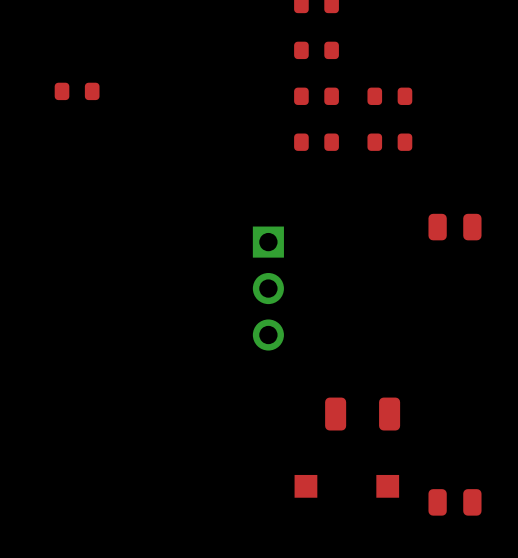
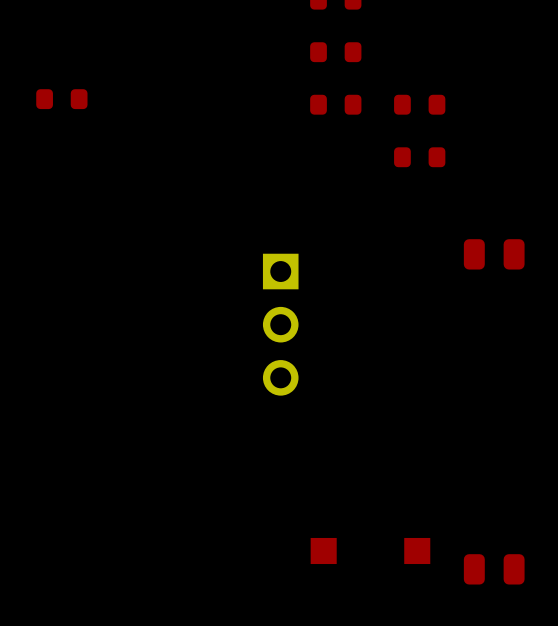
part: (316, 142) -> none
part: (362, 414) -> none

